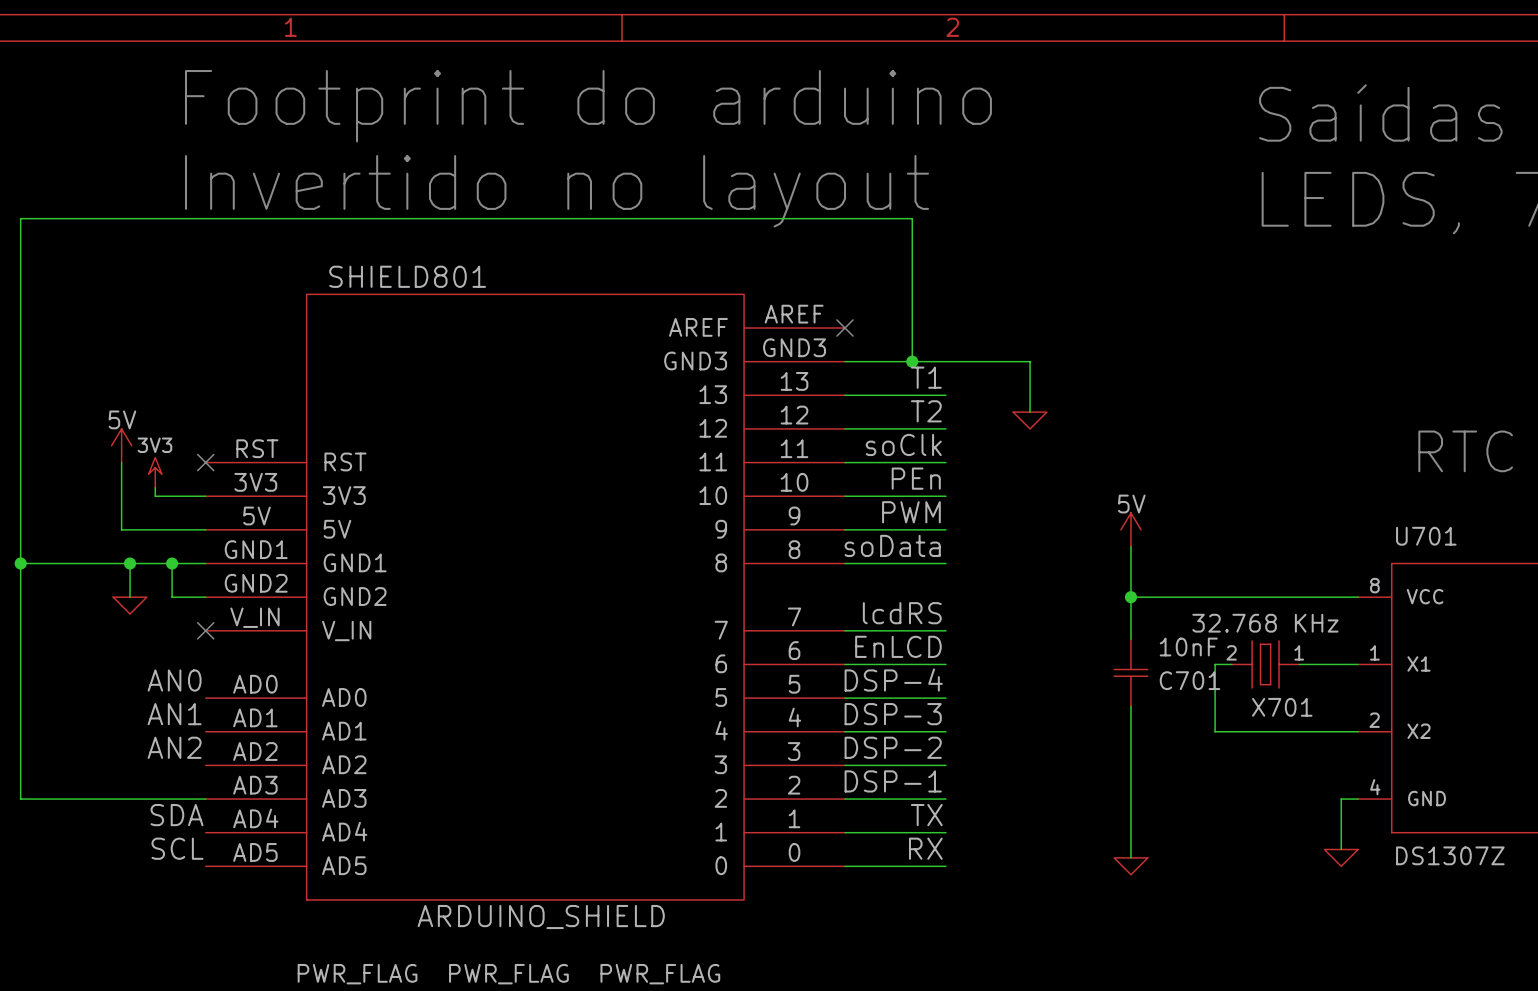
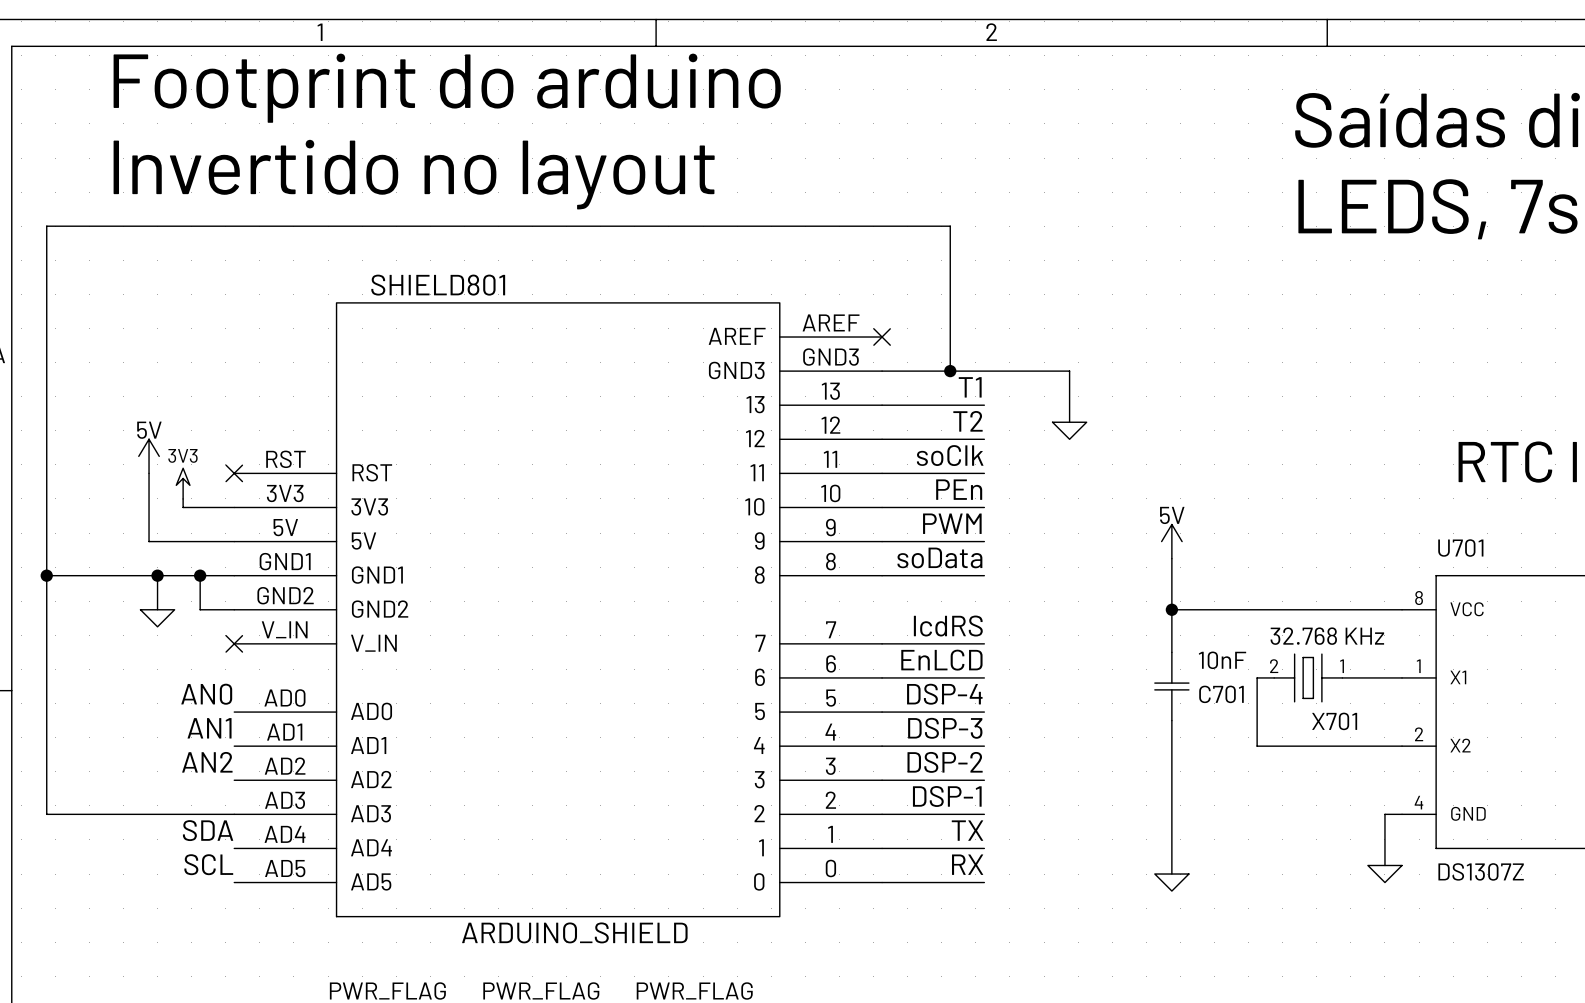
text position: Footprint do arduino (588, 106) -> Footprint do arduino (447, 88)
text position: Invertido no layout (557, 191) -> Invertido no layout (414, 174)

